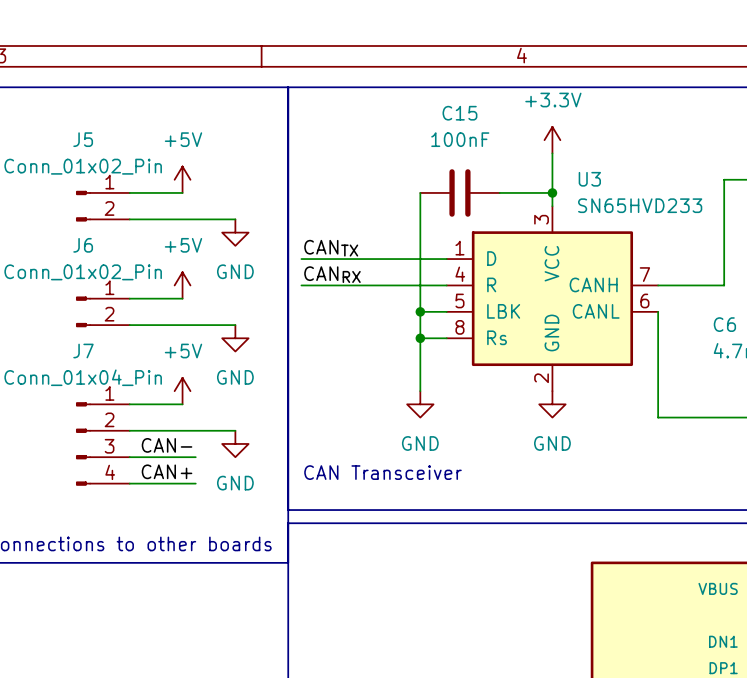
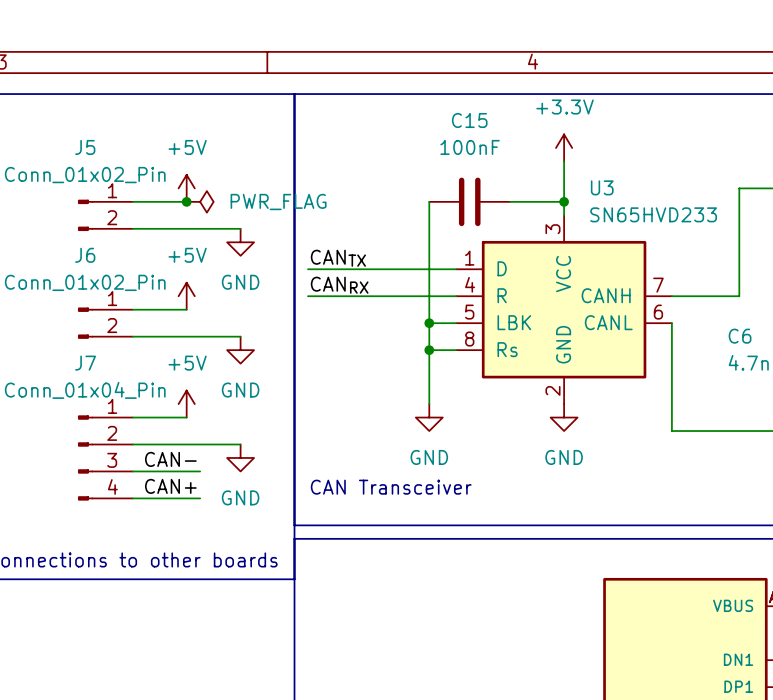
junction: none -> (186, 201)
power symbol: none -> PWR_FLAG (200, 201)

